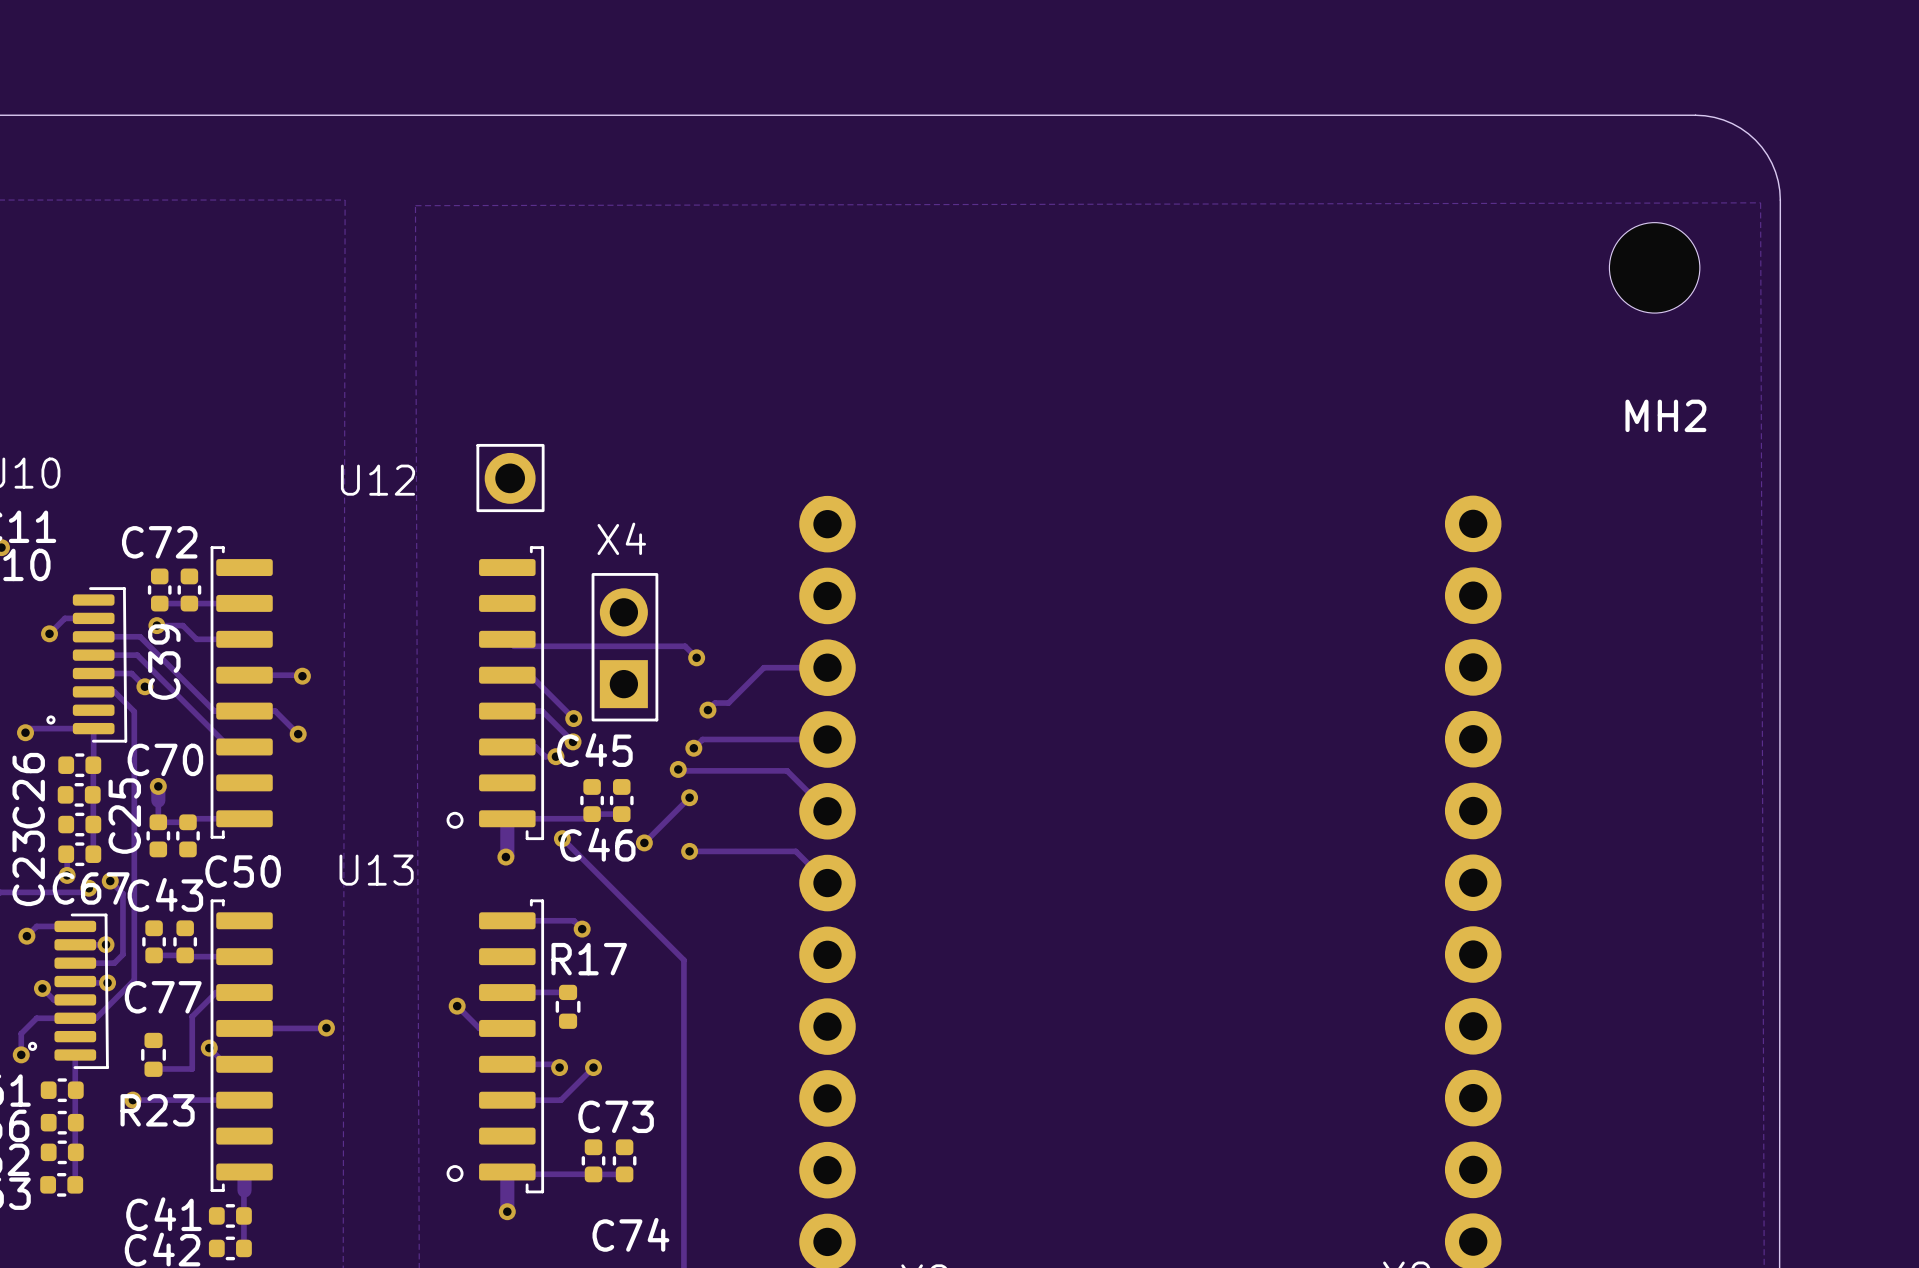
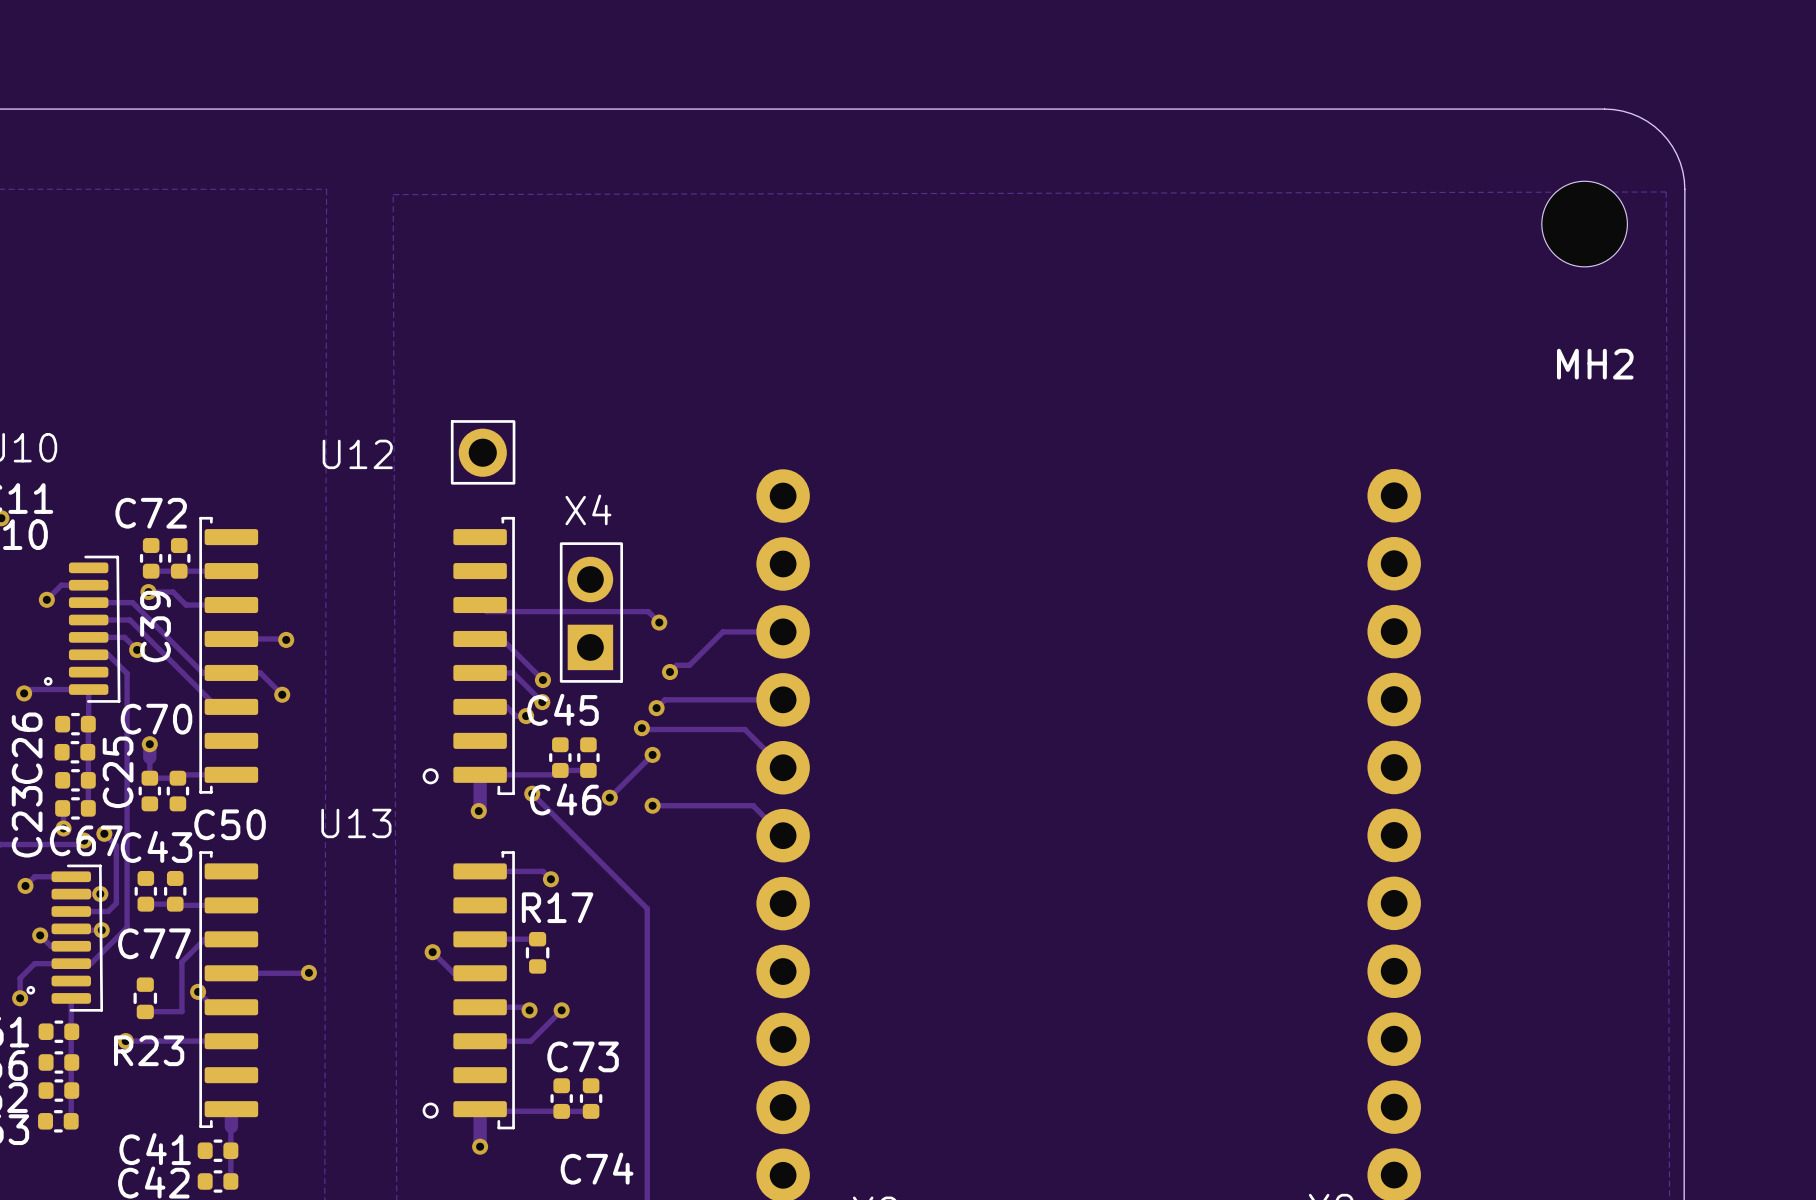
MH2 position: (1654, 267) -> (1584, 224)

